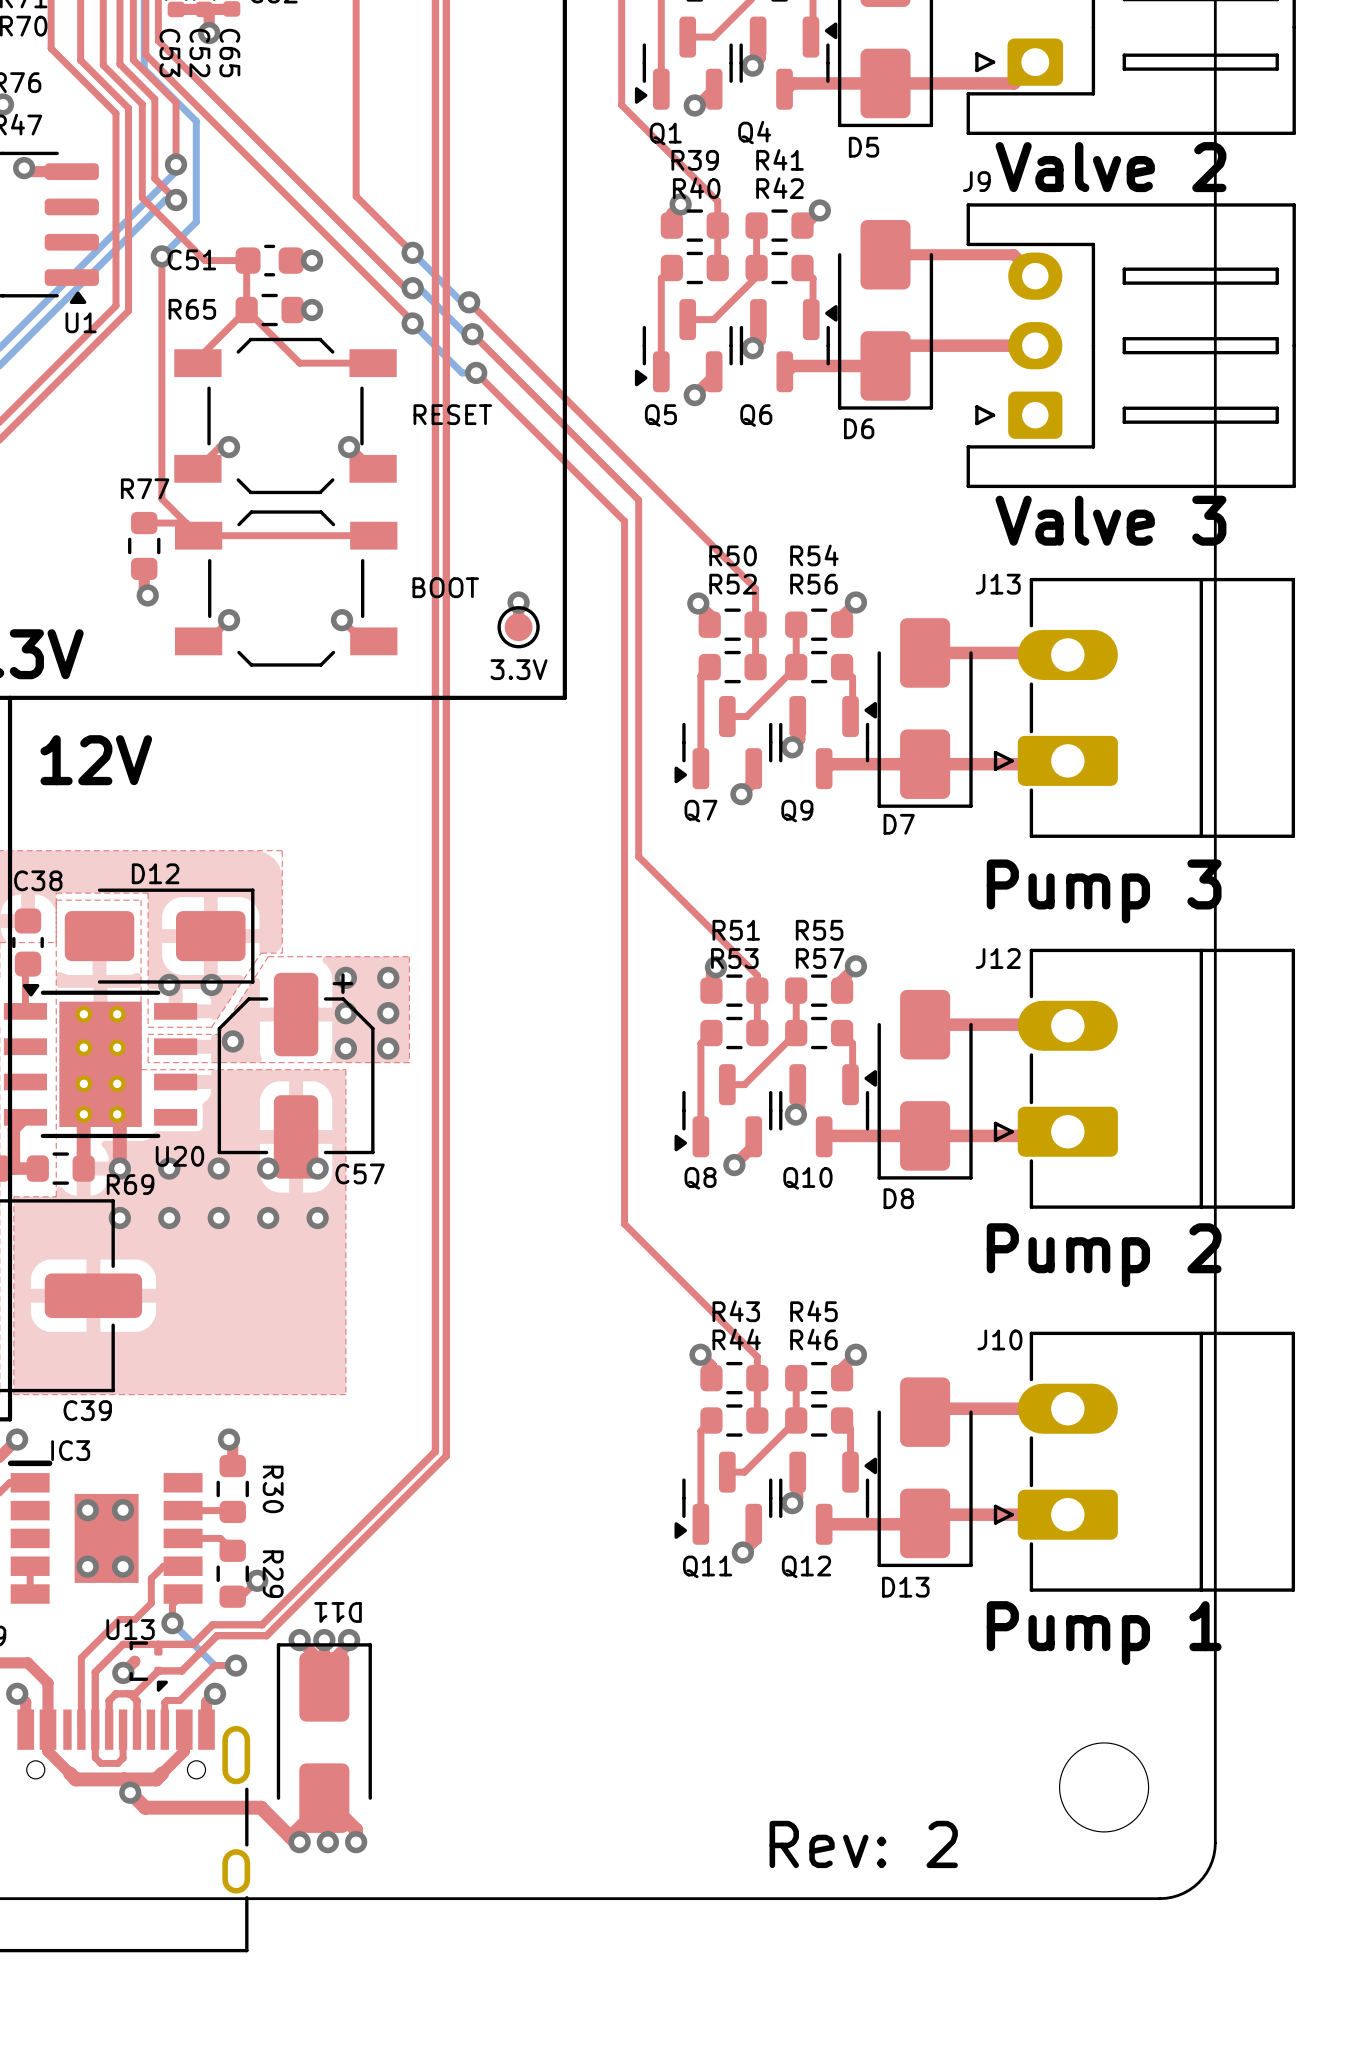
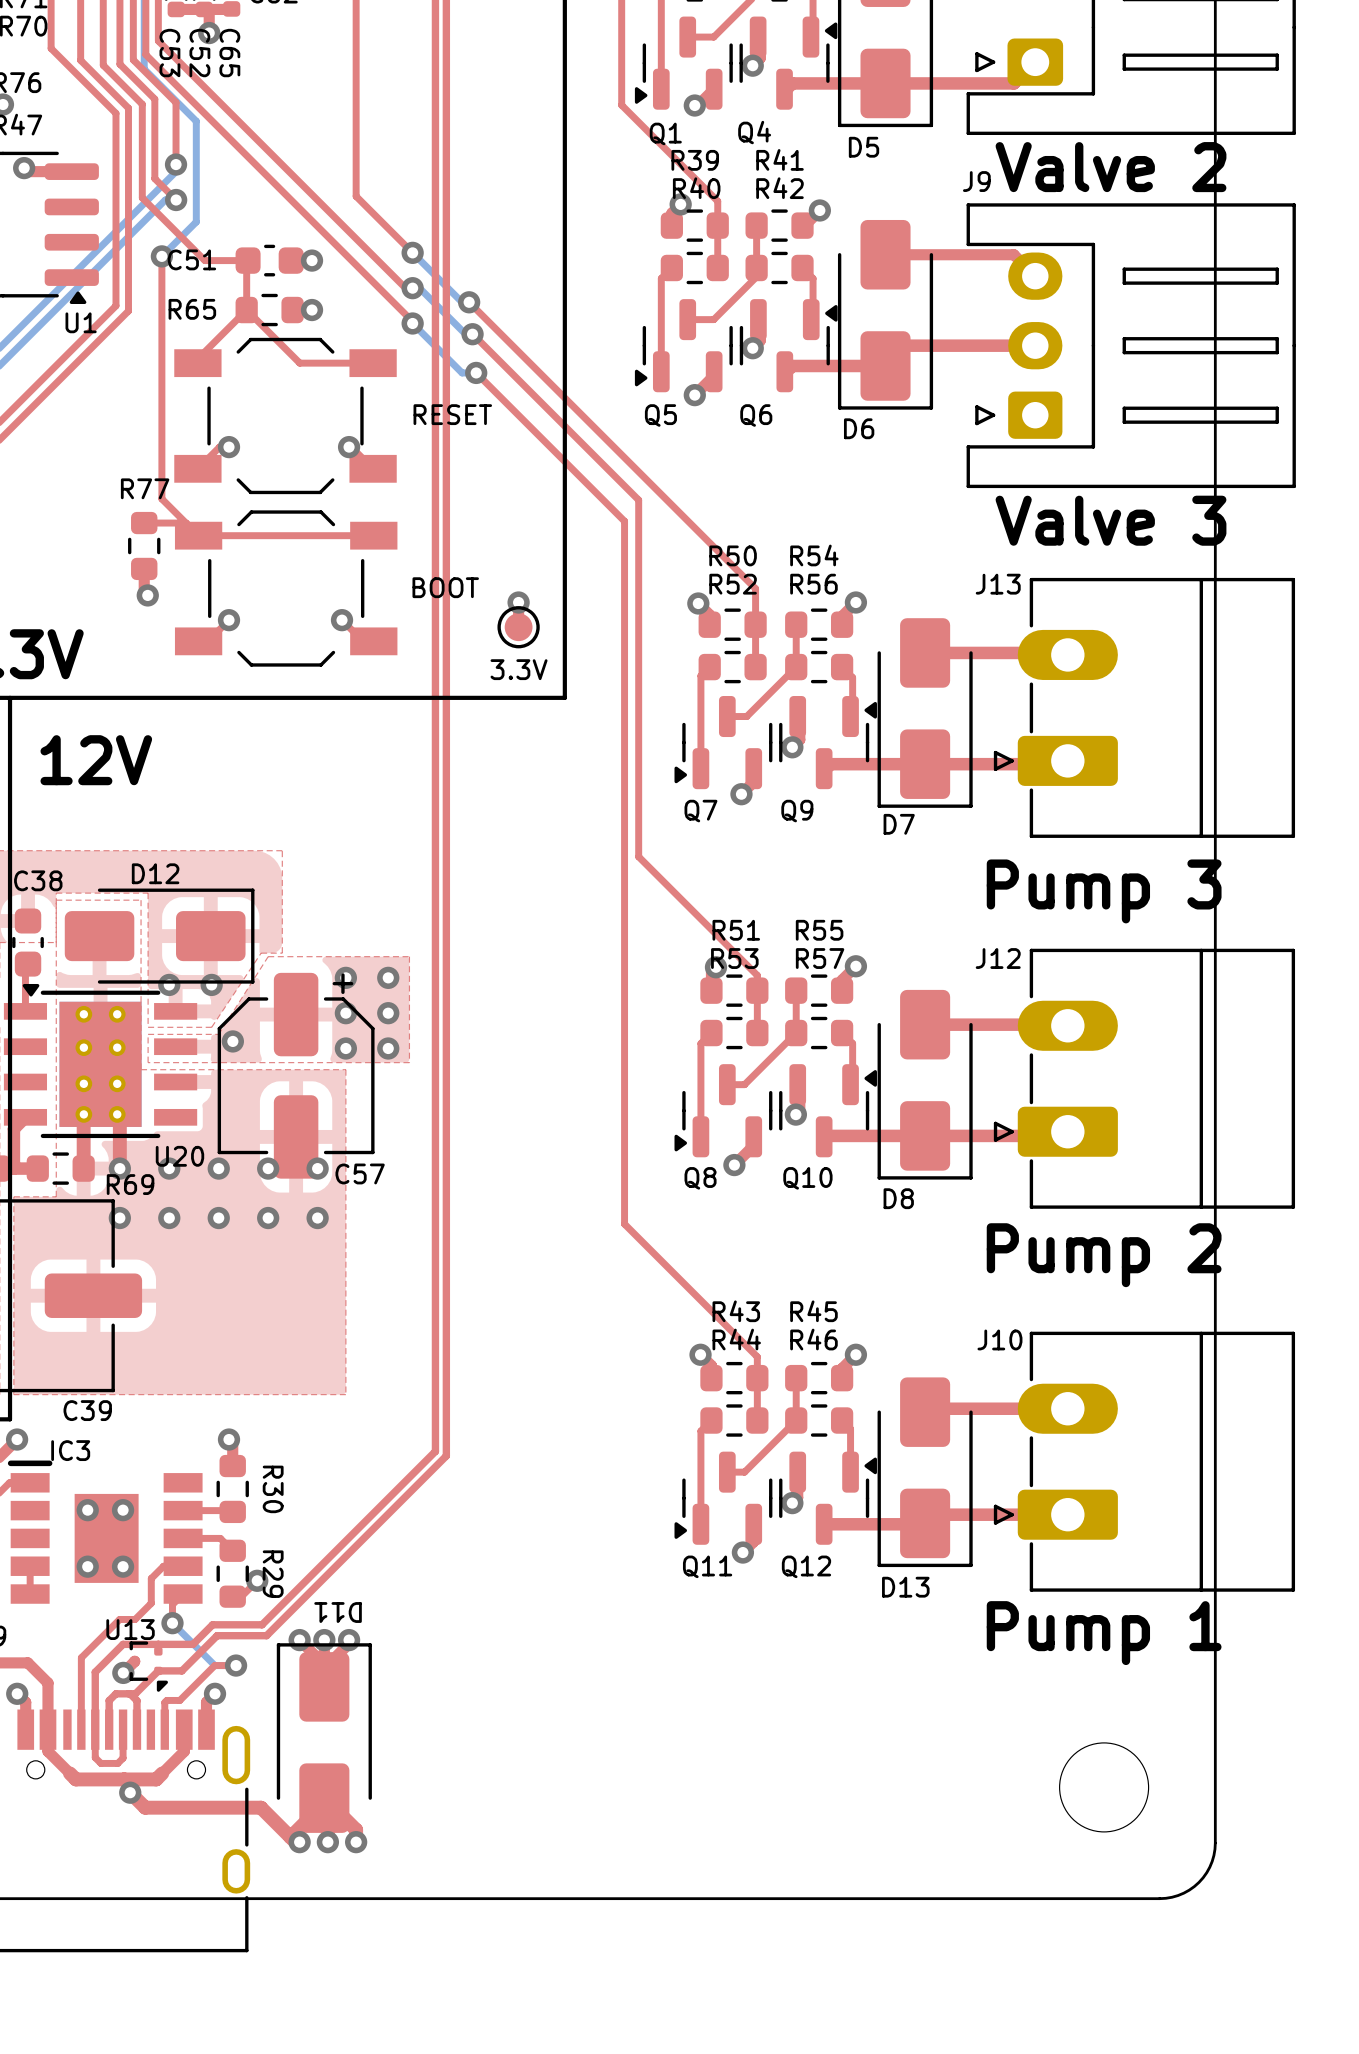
text: Rev: 2 (863, 1844) -> none

